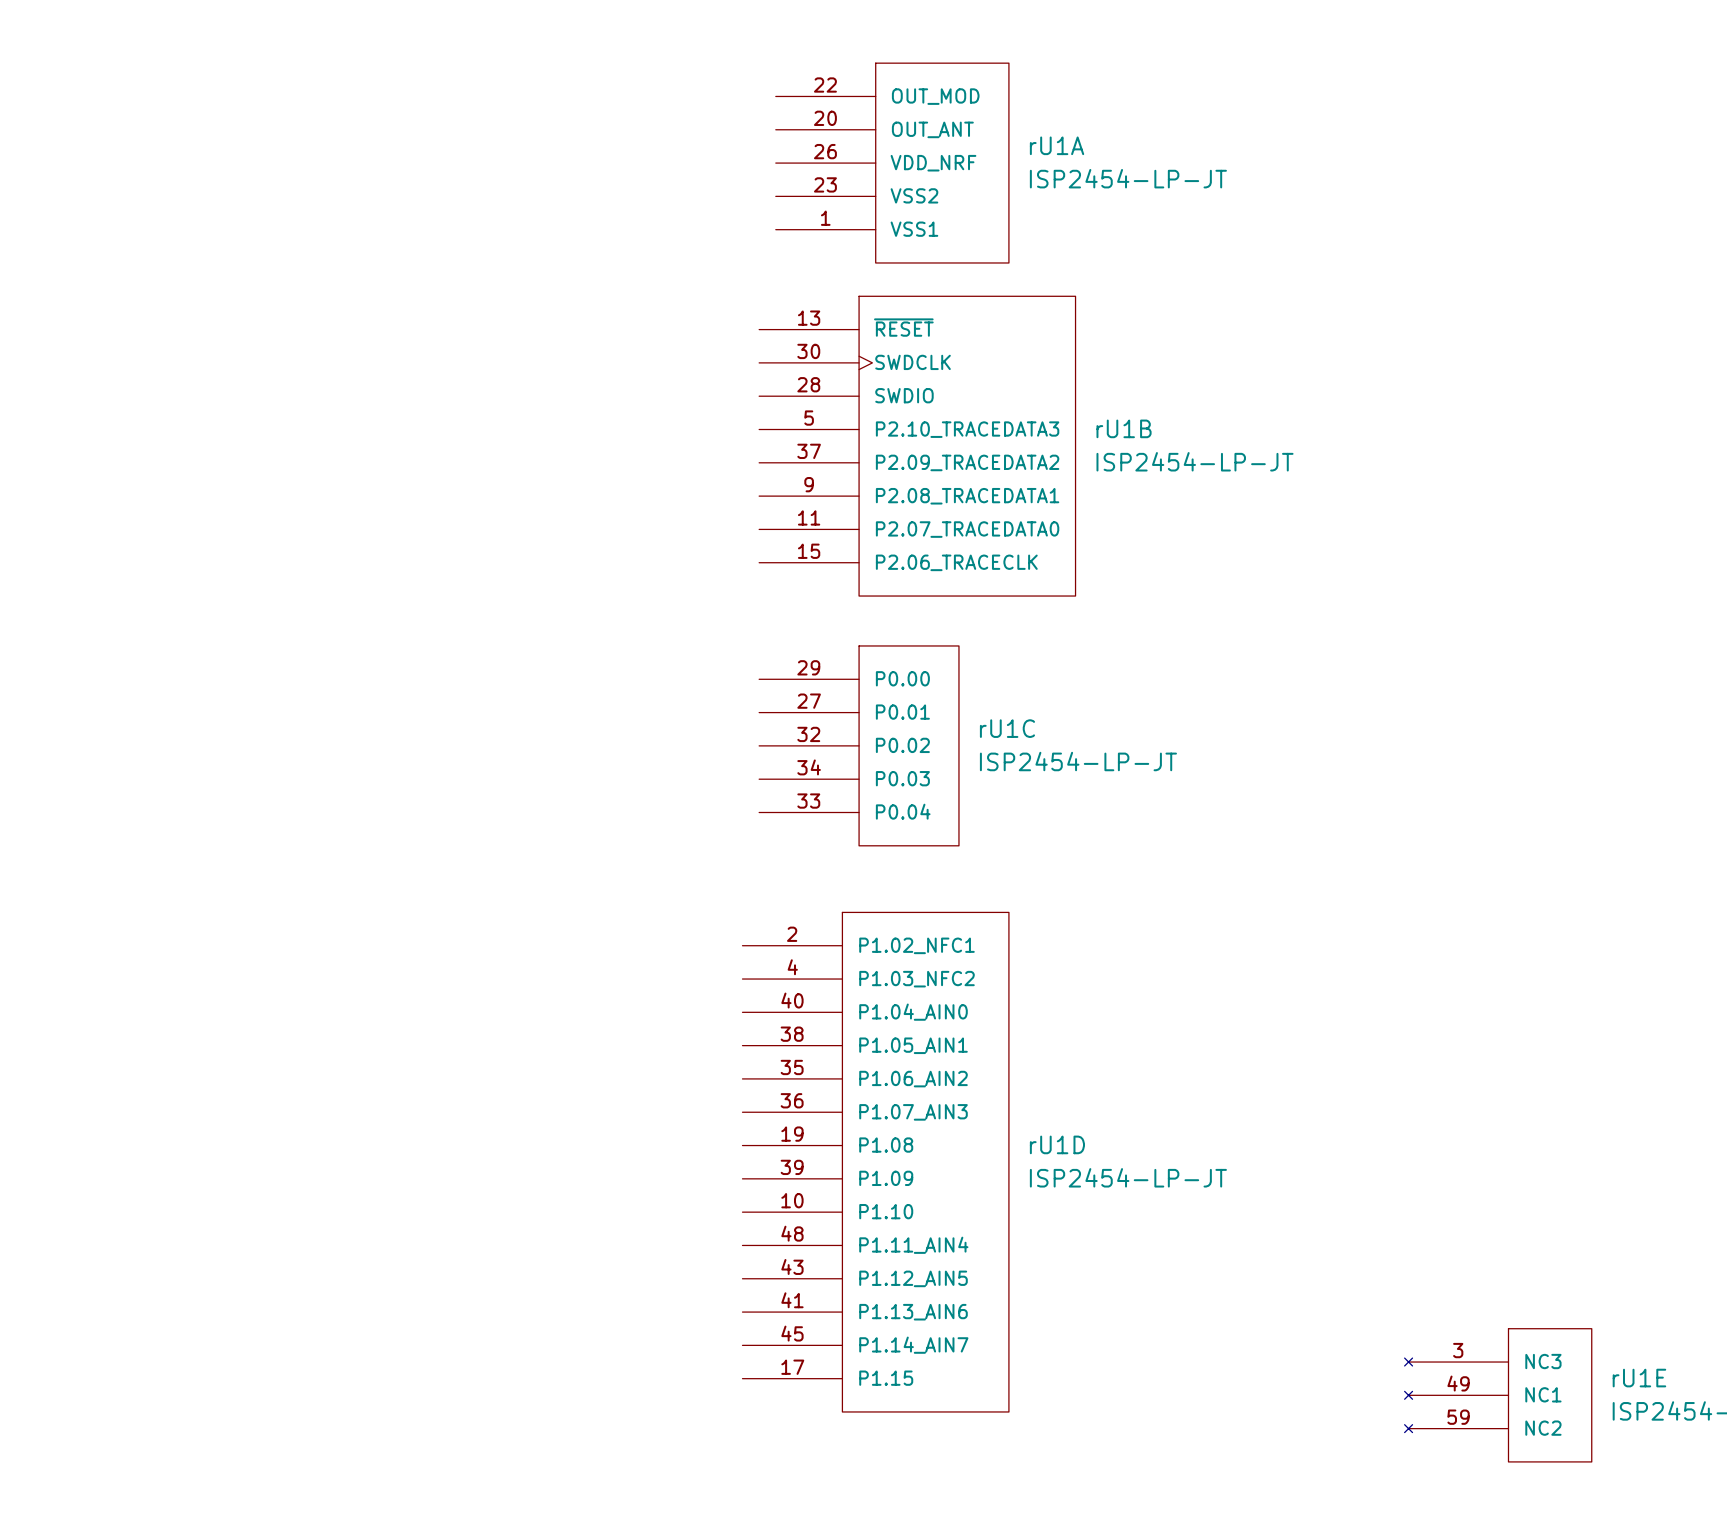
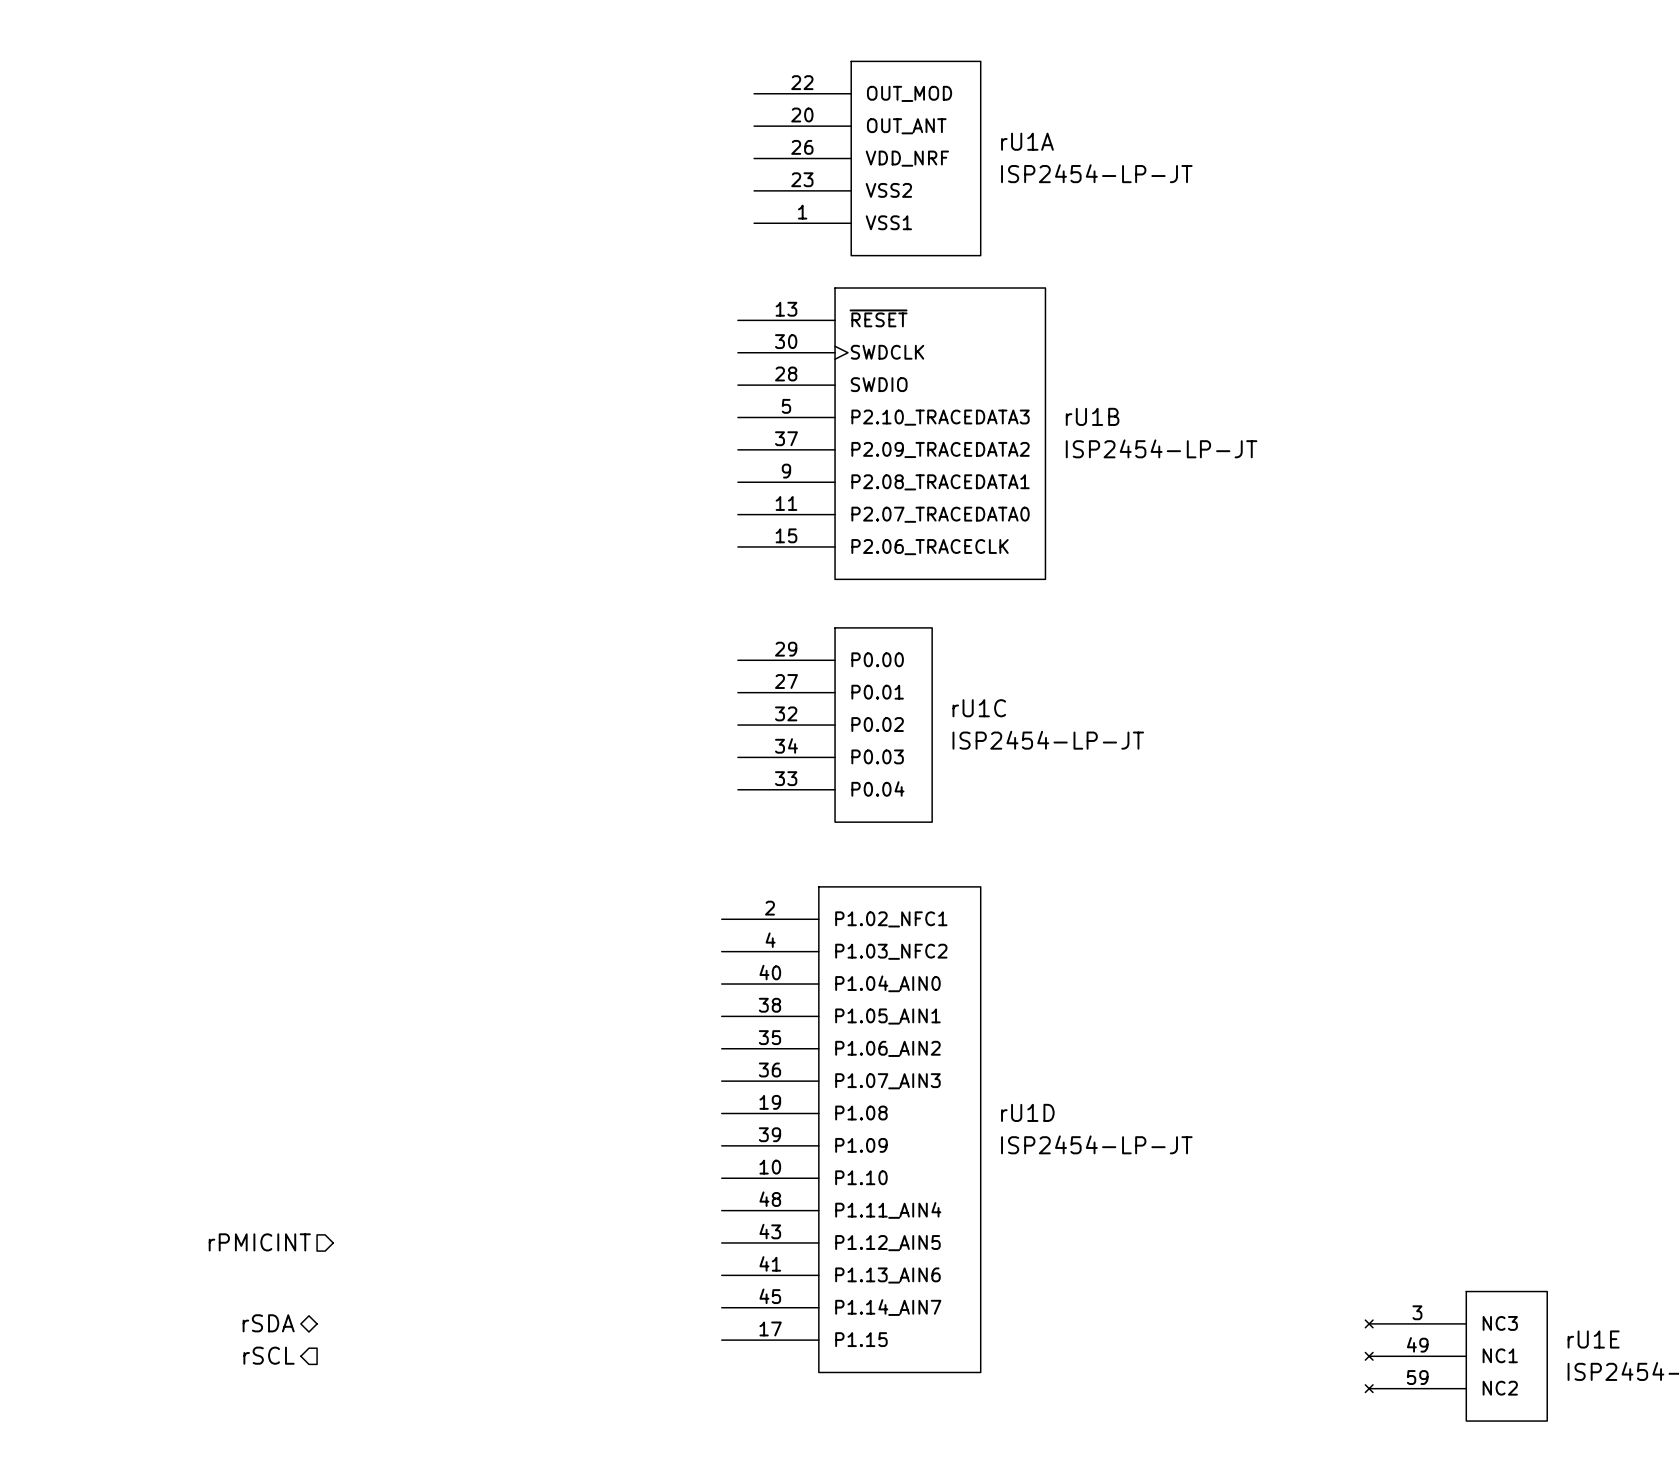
hierarchical label: none -> rPMICINT (259, 1242)
hierarchical label: none -> rSDA (268, 1323)
hierarchical label: none -> rSCL (269, 1355)

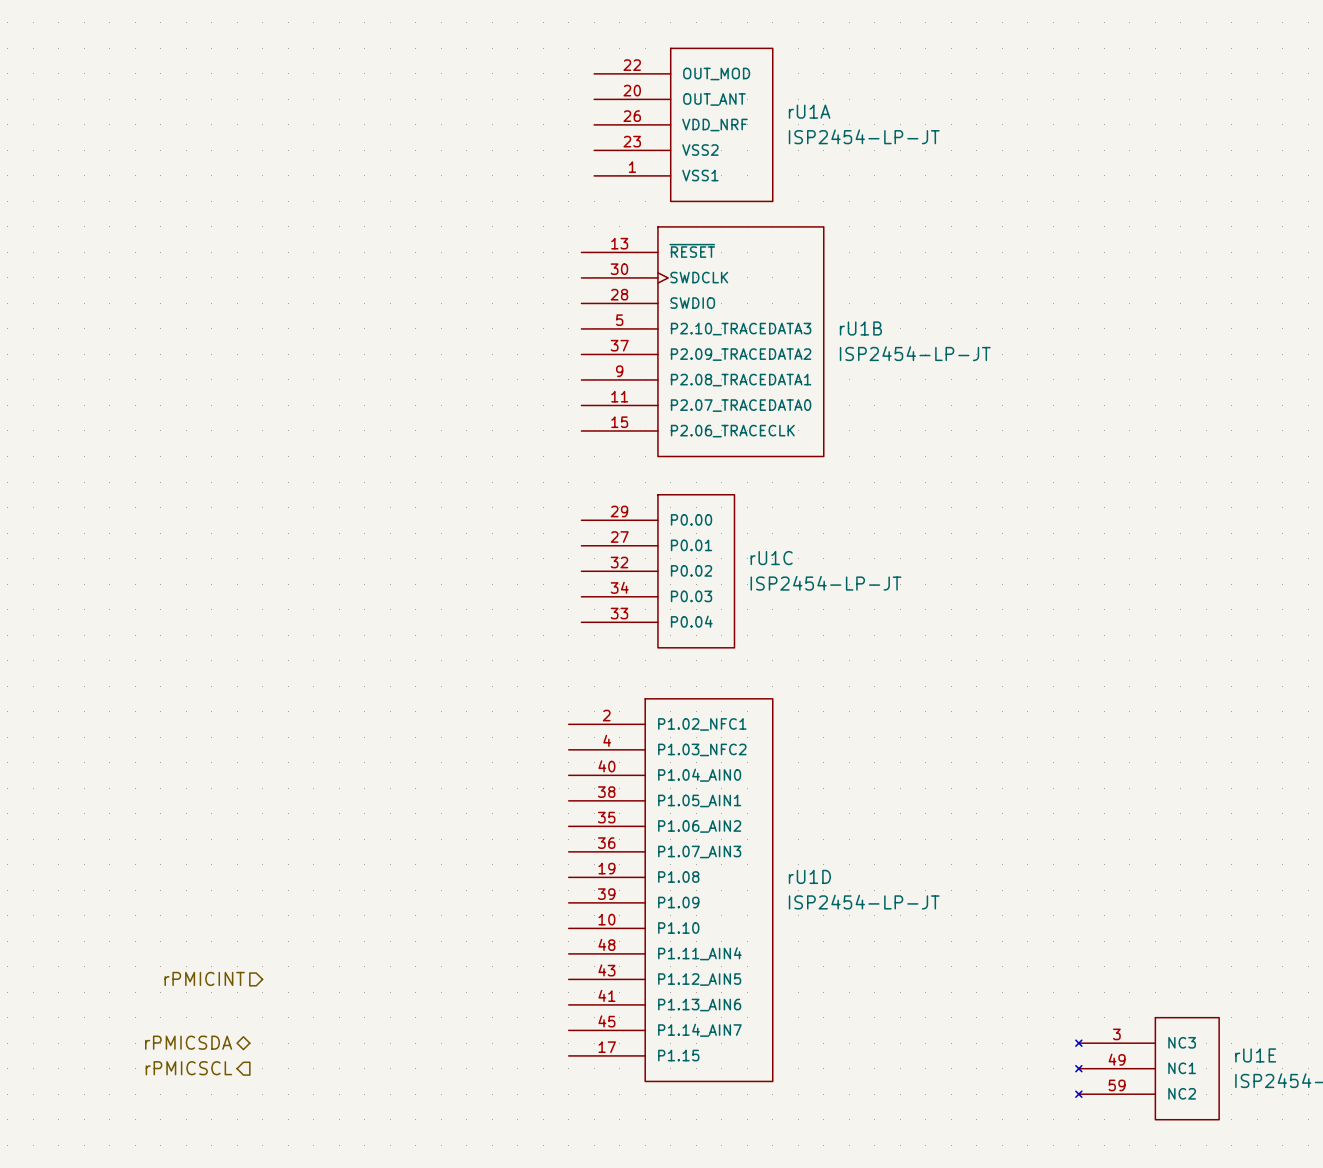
hierarchical label: rSDA (268, 1323) -> rPMICSDA (188, 1042)
hierarchical label: rSCL (269, 1355) -> rPMICSCL (188, 1068)

